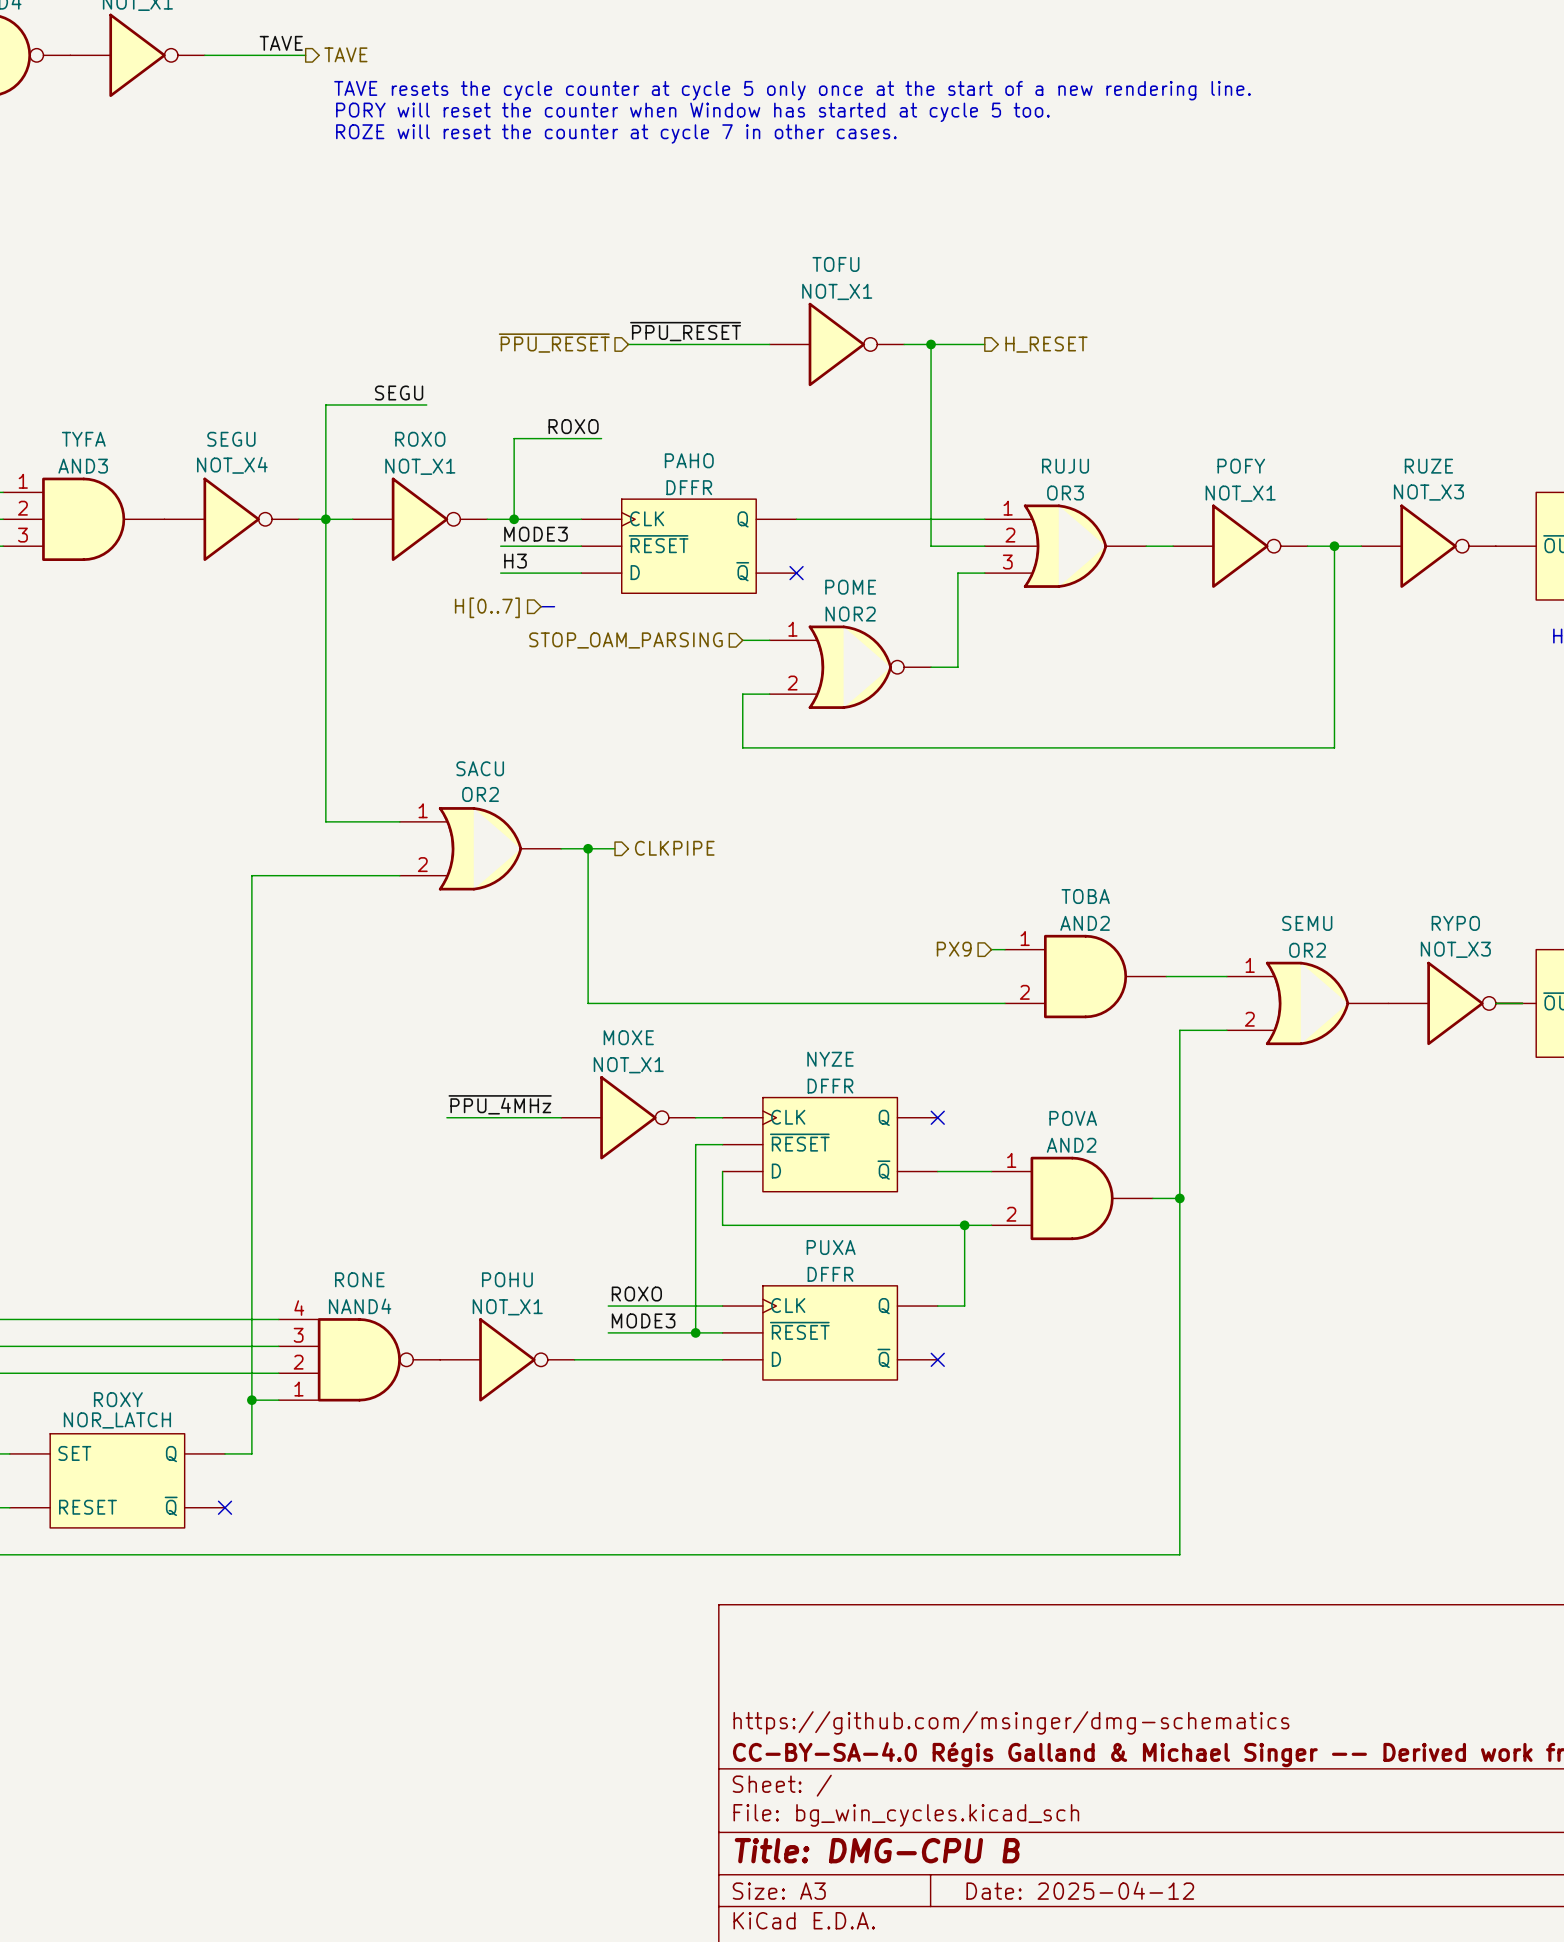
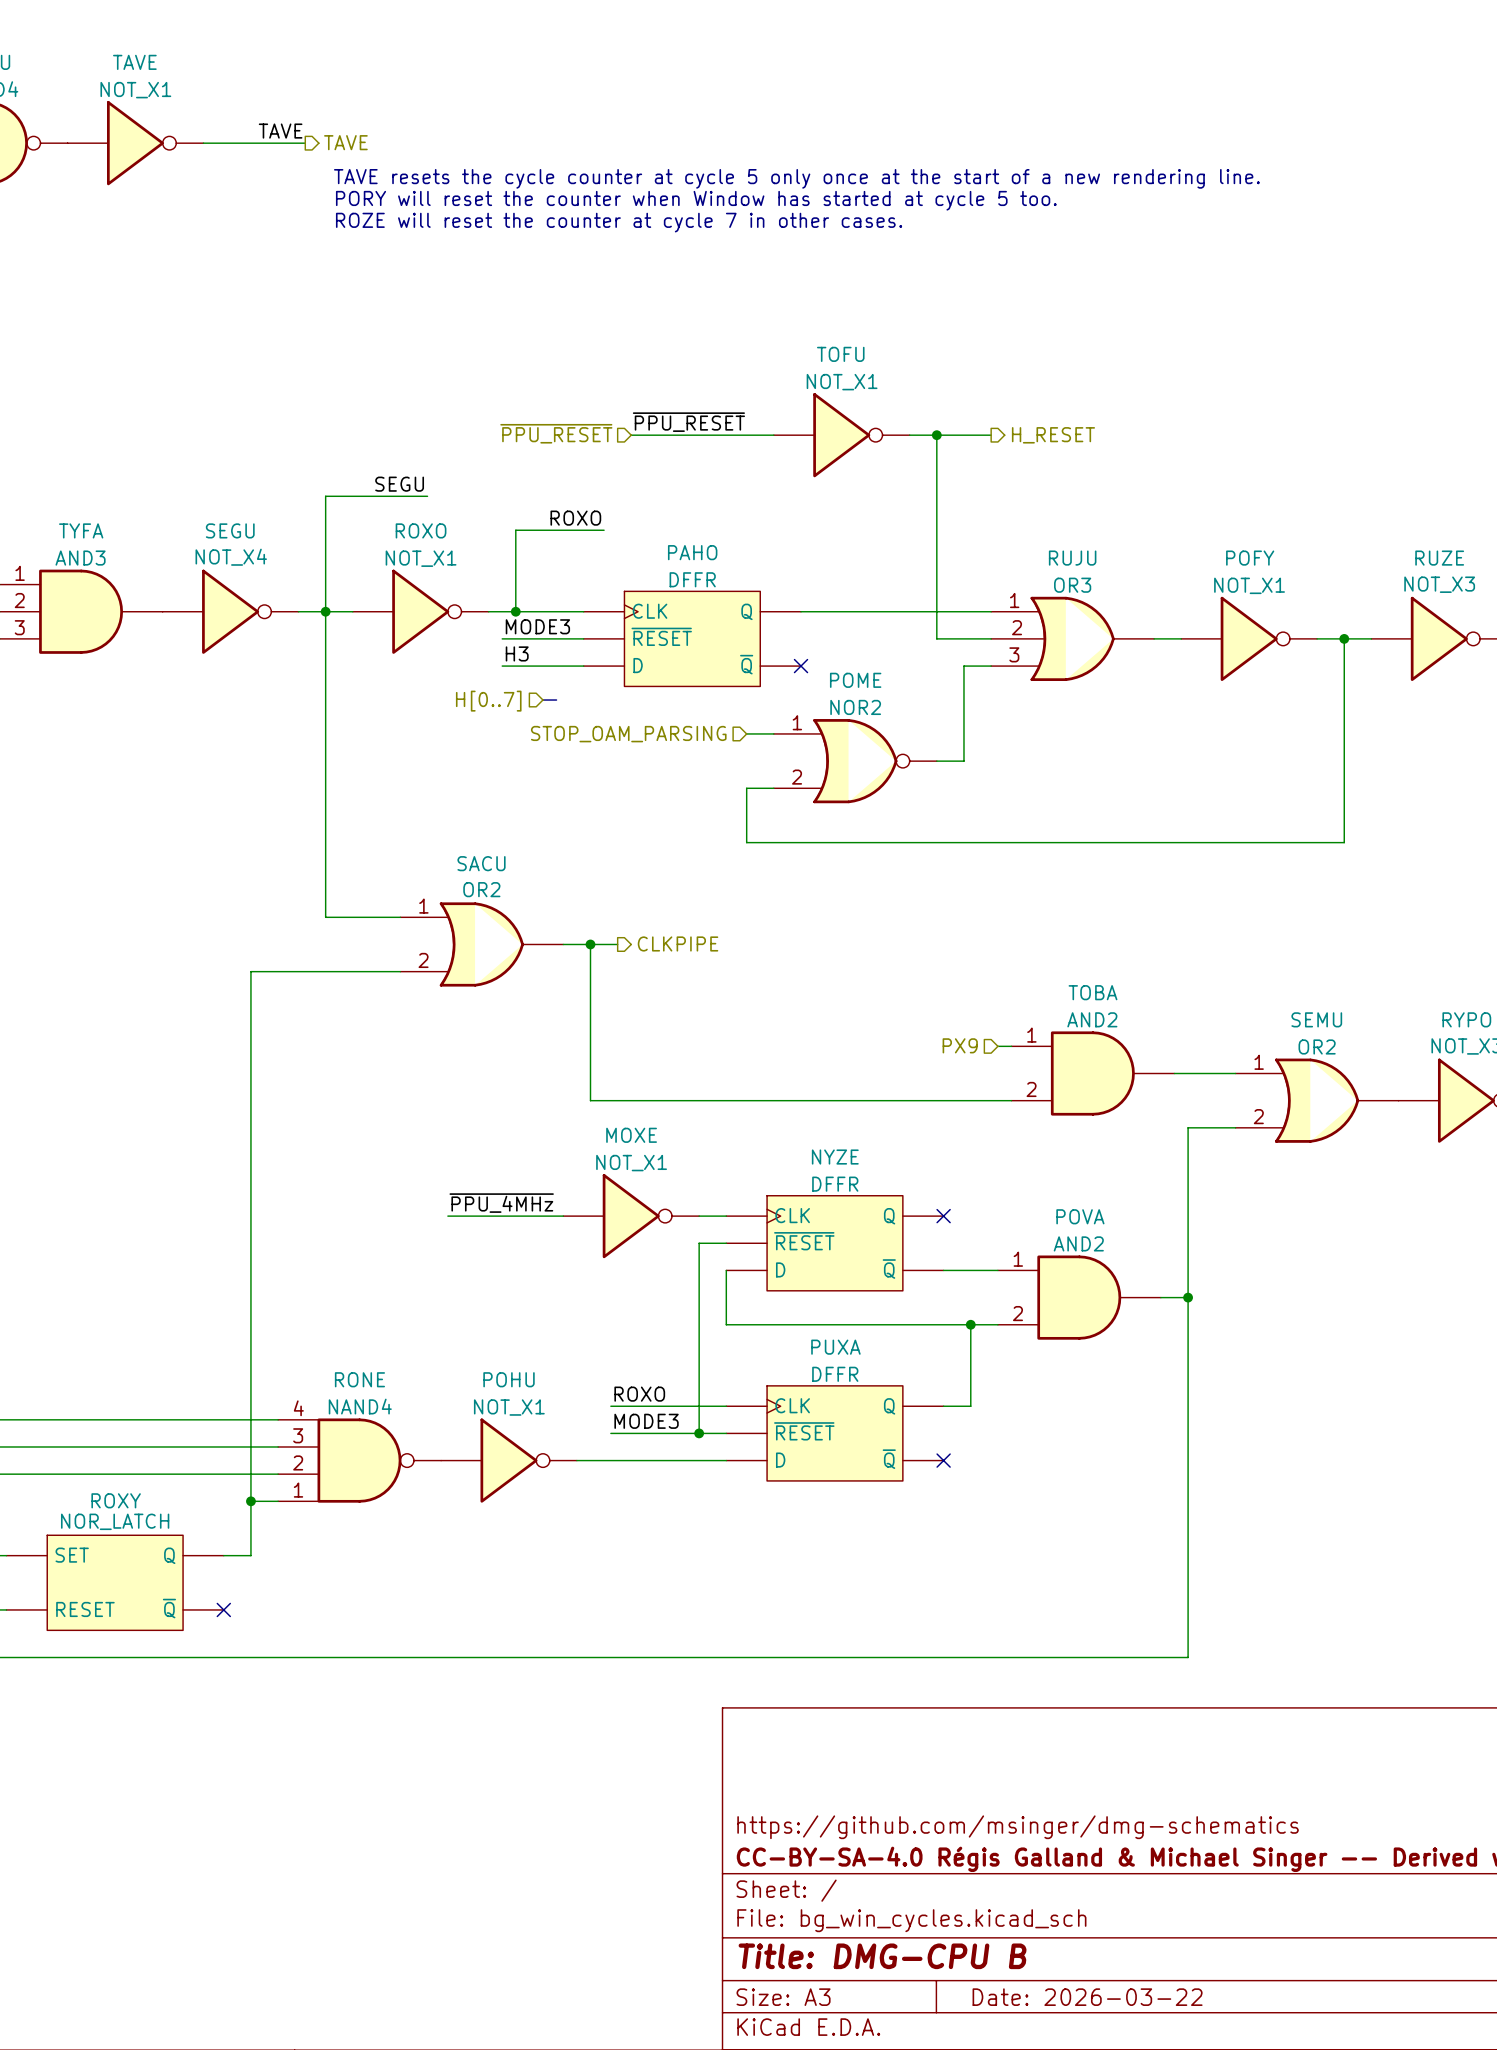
title block: Date: 2025-04-12 (1080, 1890) -> Date: 2026-03-22 (1087, 1997)

